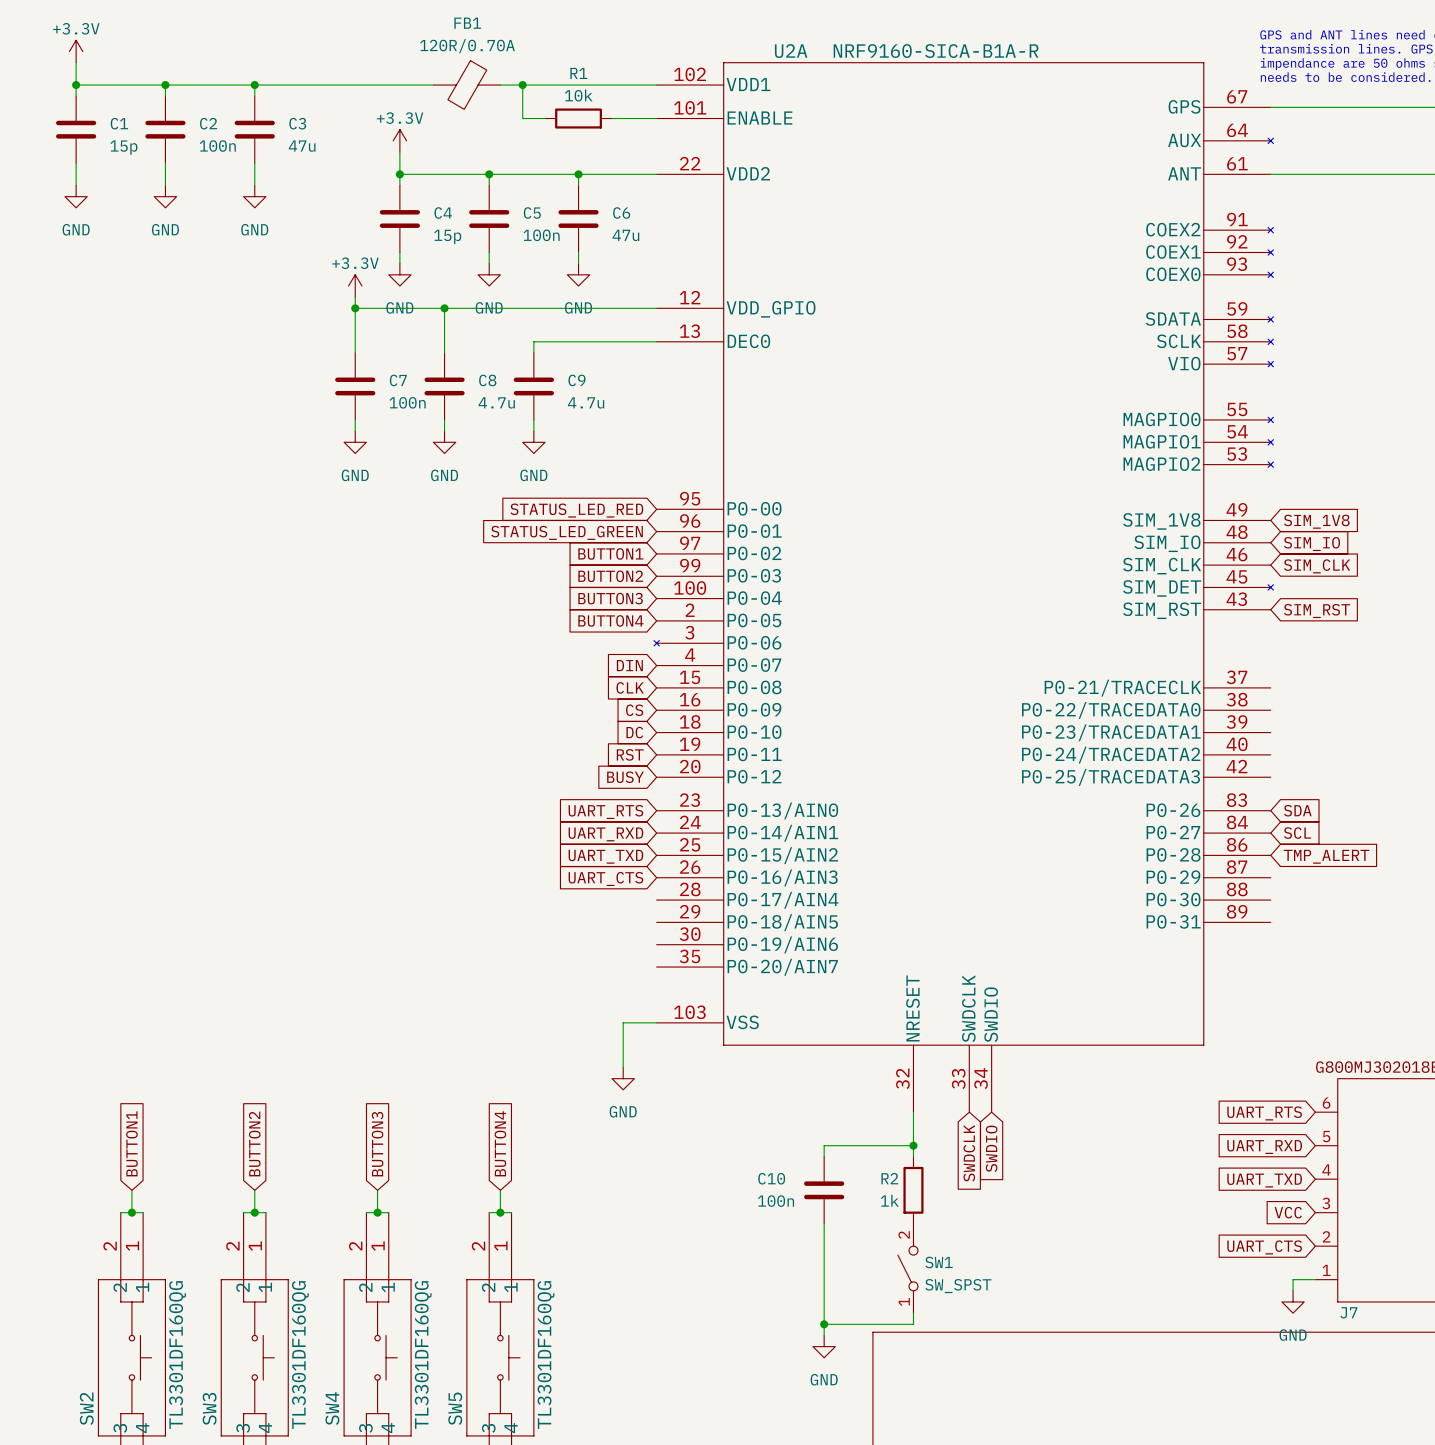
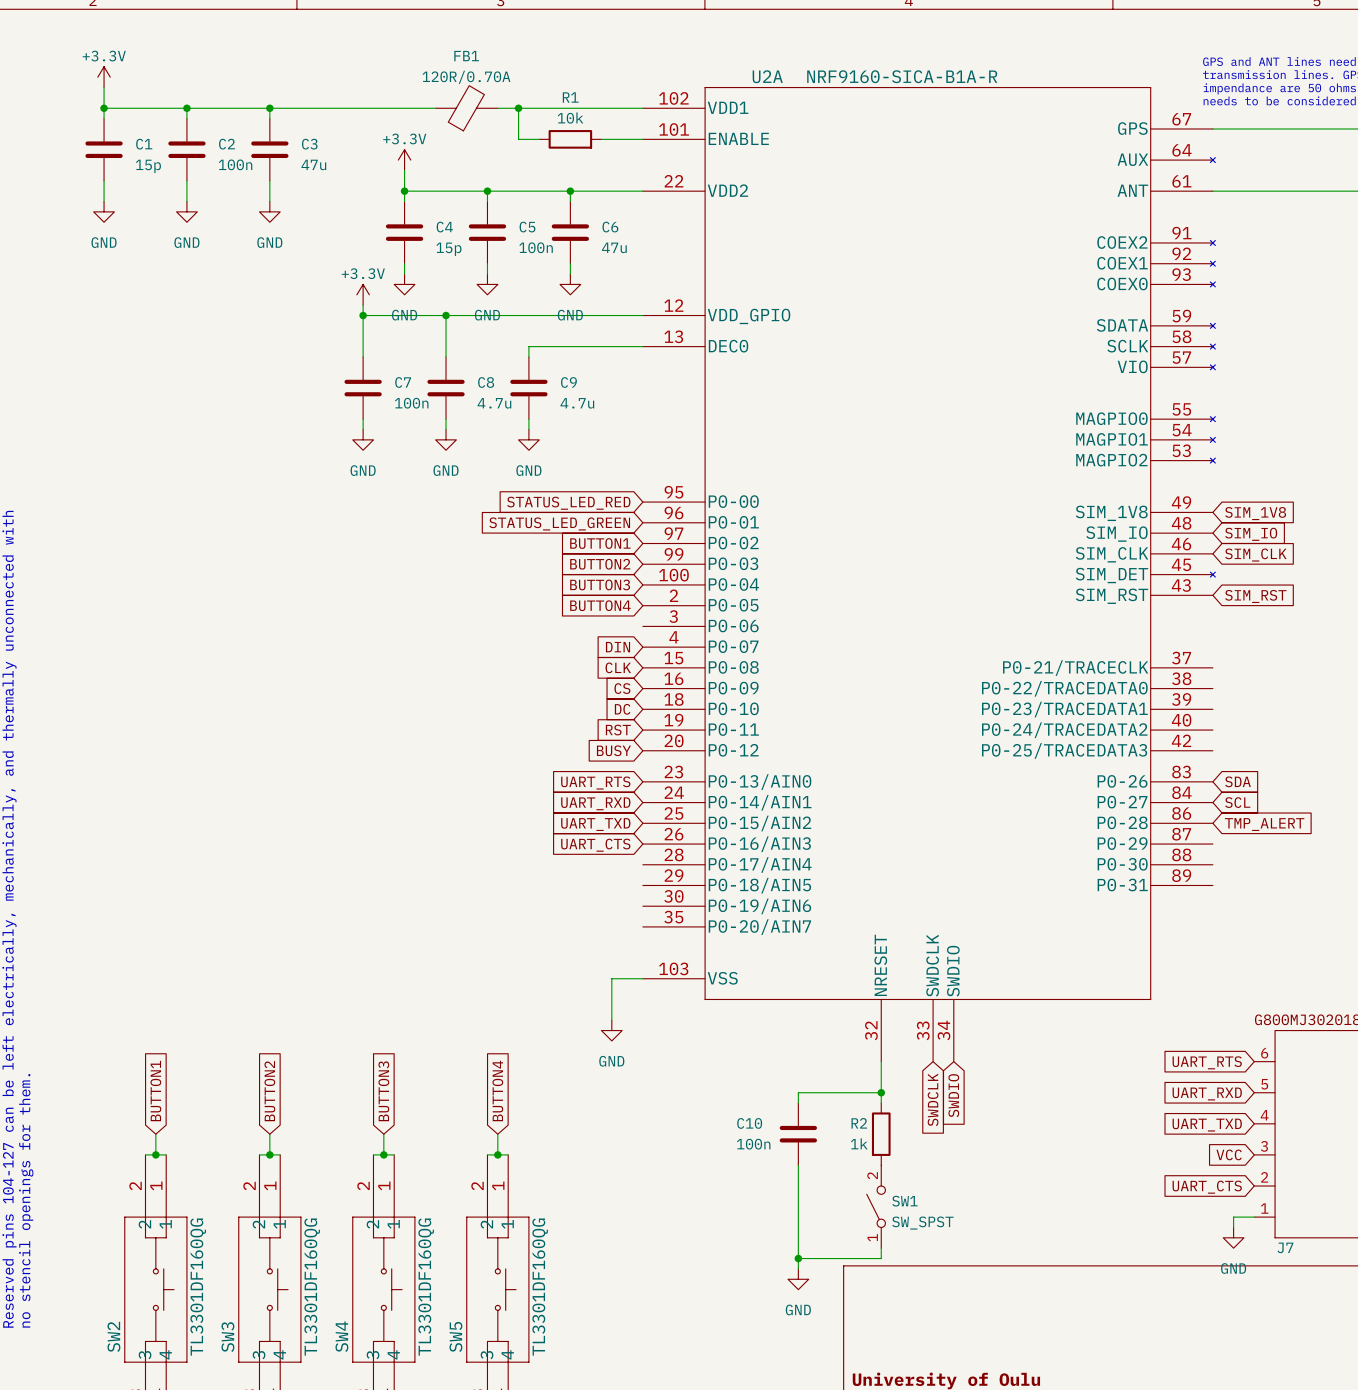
U2A symbol: [654, 62, 1274, 1113] -> [642, 87, 1216, 1062]
FB1 rotation: 0° (467, 85) -> 180° (466, 108)

